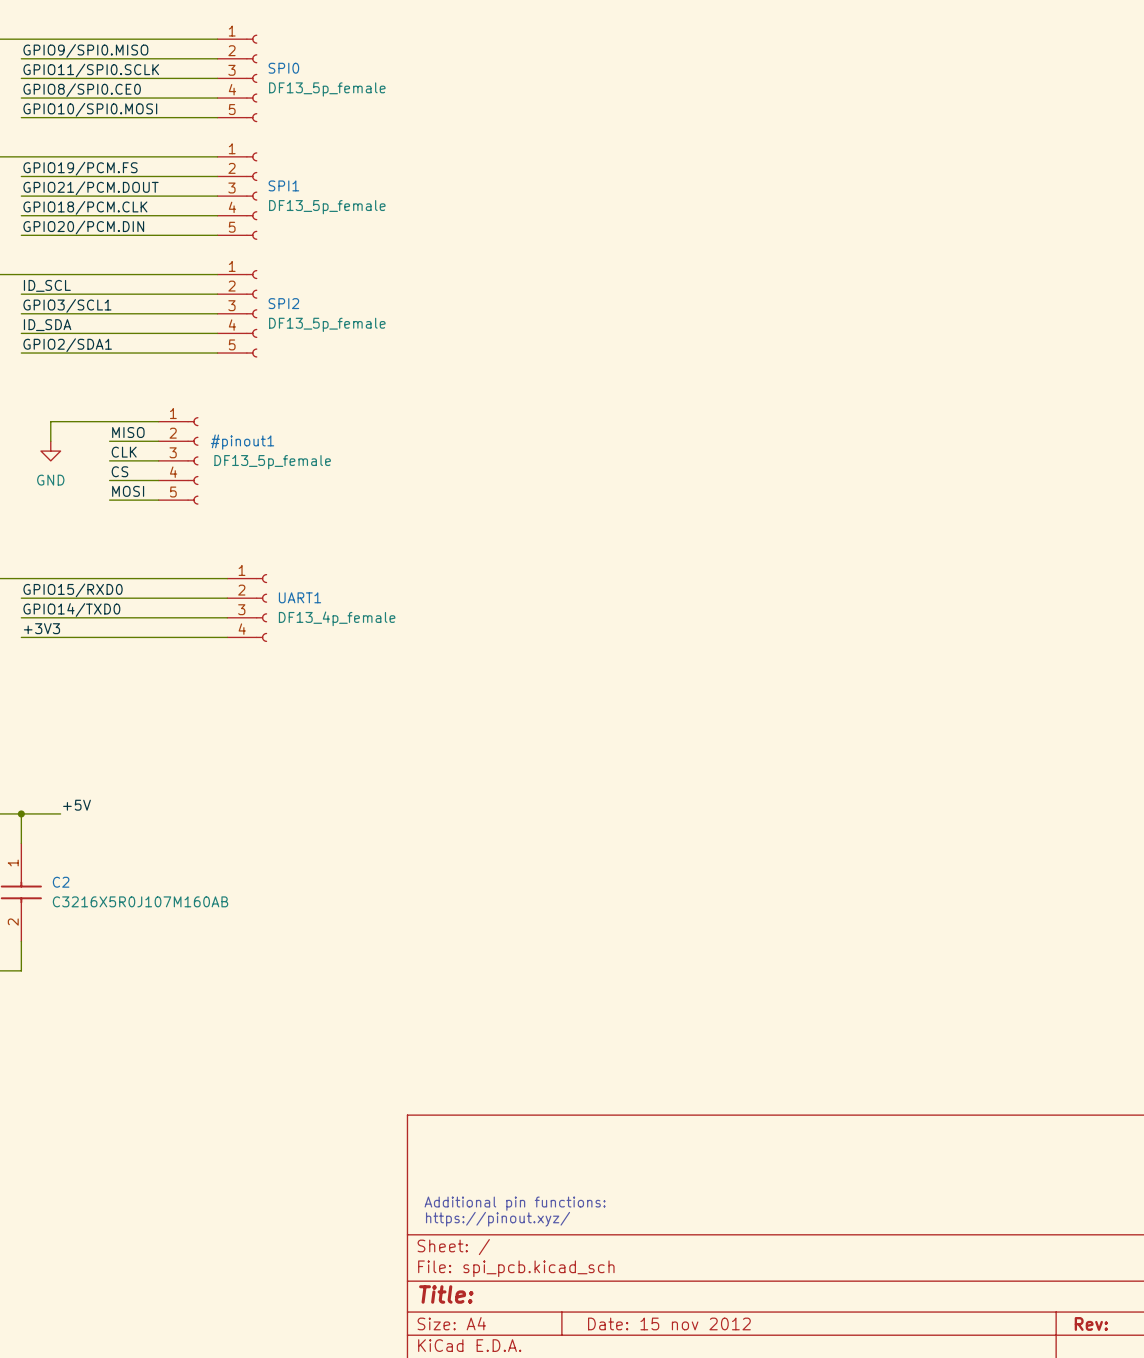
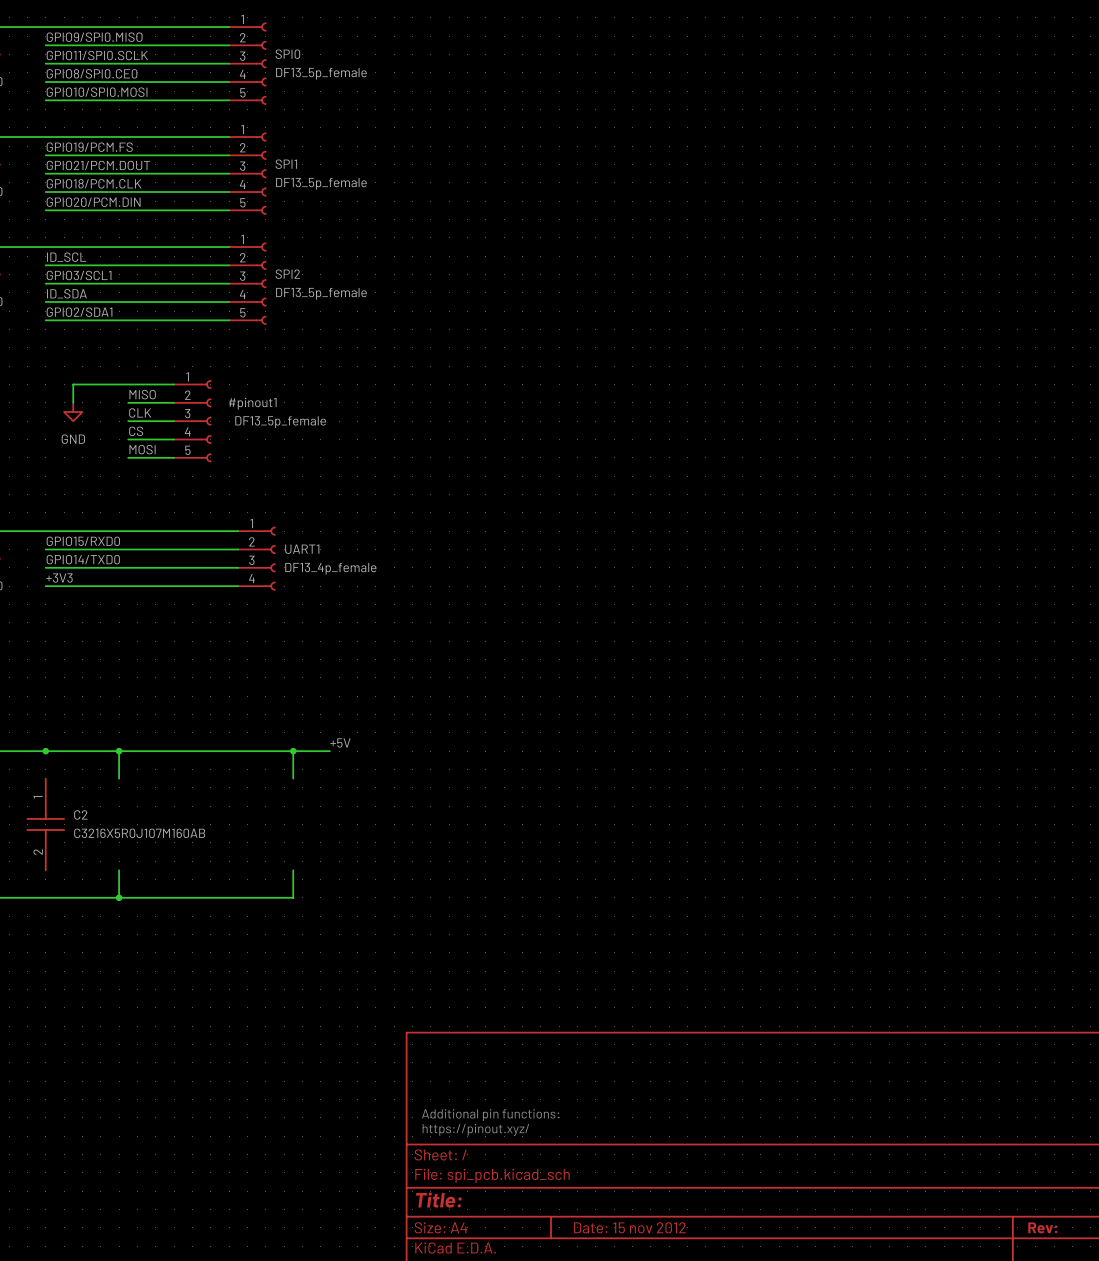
label: +5V (77, 805) -> none
label: none -> +5V (340, 743)
wire: (21, 813) (21, 843) -> (119, 751) (119, 778)
wire: none -> (82, 751) (329, 751)
junction: none -> (119, 751)
wire: none -> (293, 751) (293, 778)
junction: none -> (293, 751)
wire: (21, 941) (21, 970) -> (293, 870) (293, 897) (45, 897)
wire: none -> (119, 870) (119, 897)
junction: none -> (119, 897)

